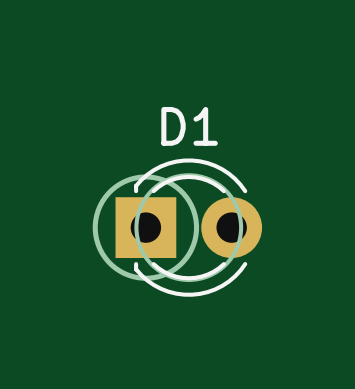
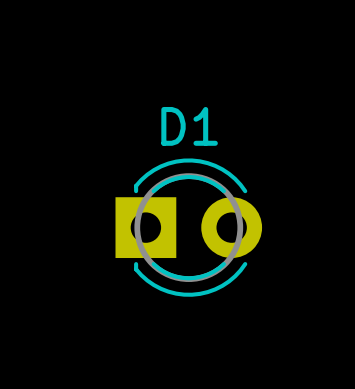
D1 footprint: [92, 158, 263, 297] -> [115, 158, 263, 297]

